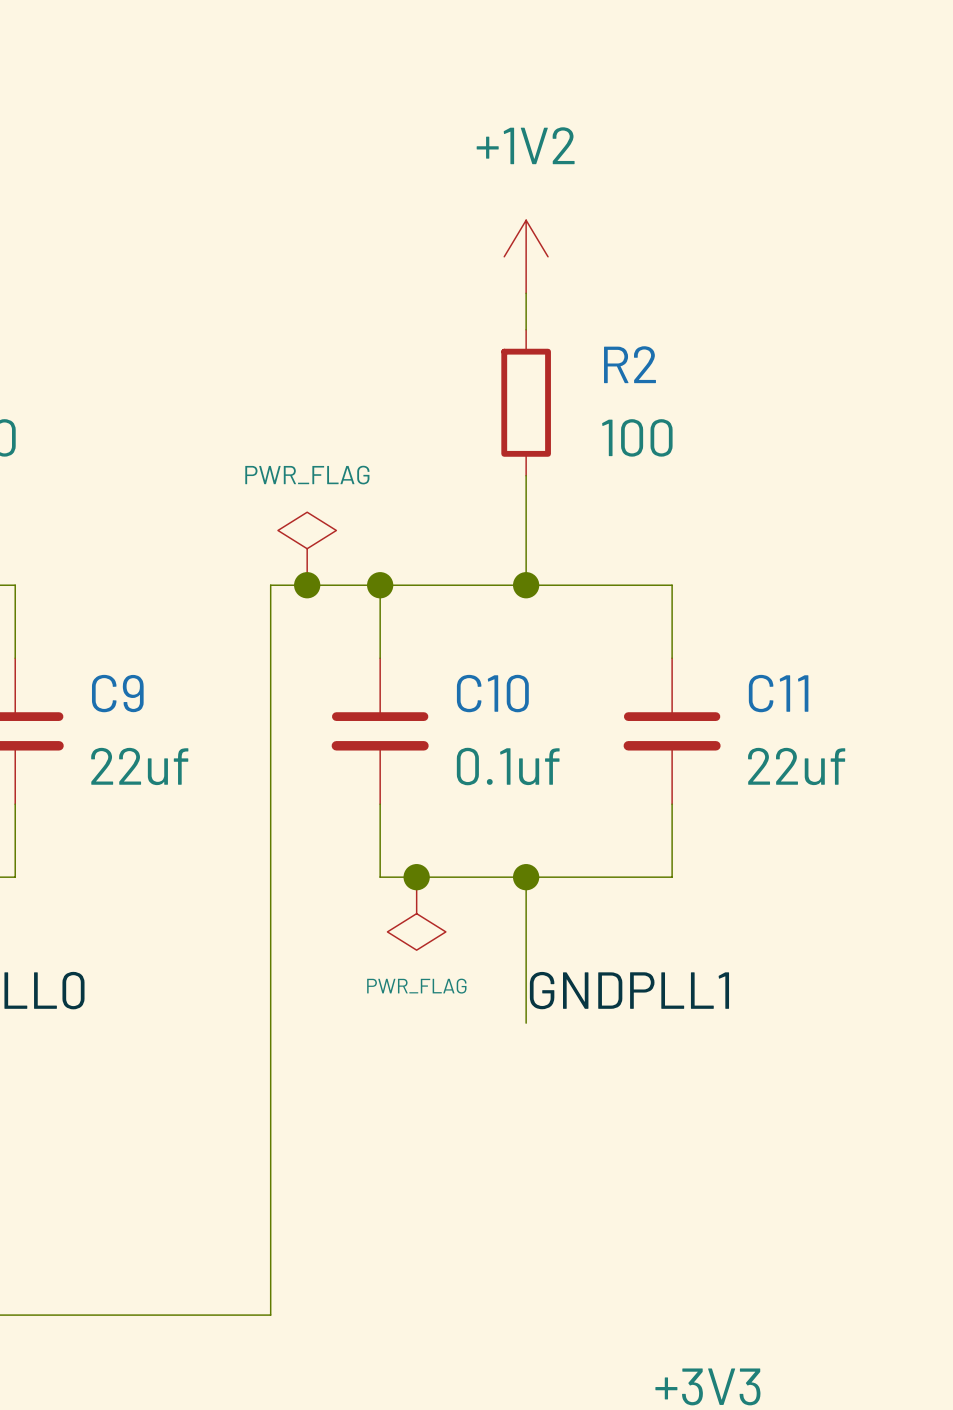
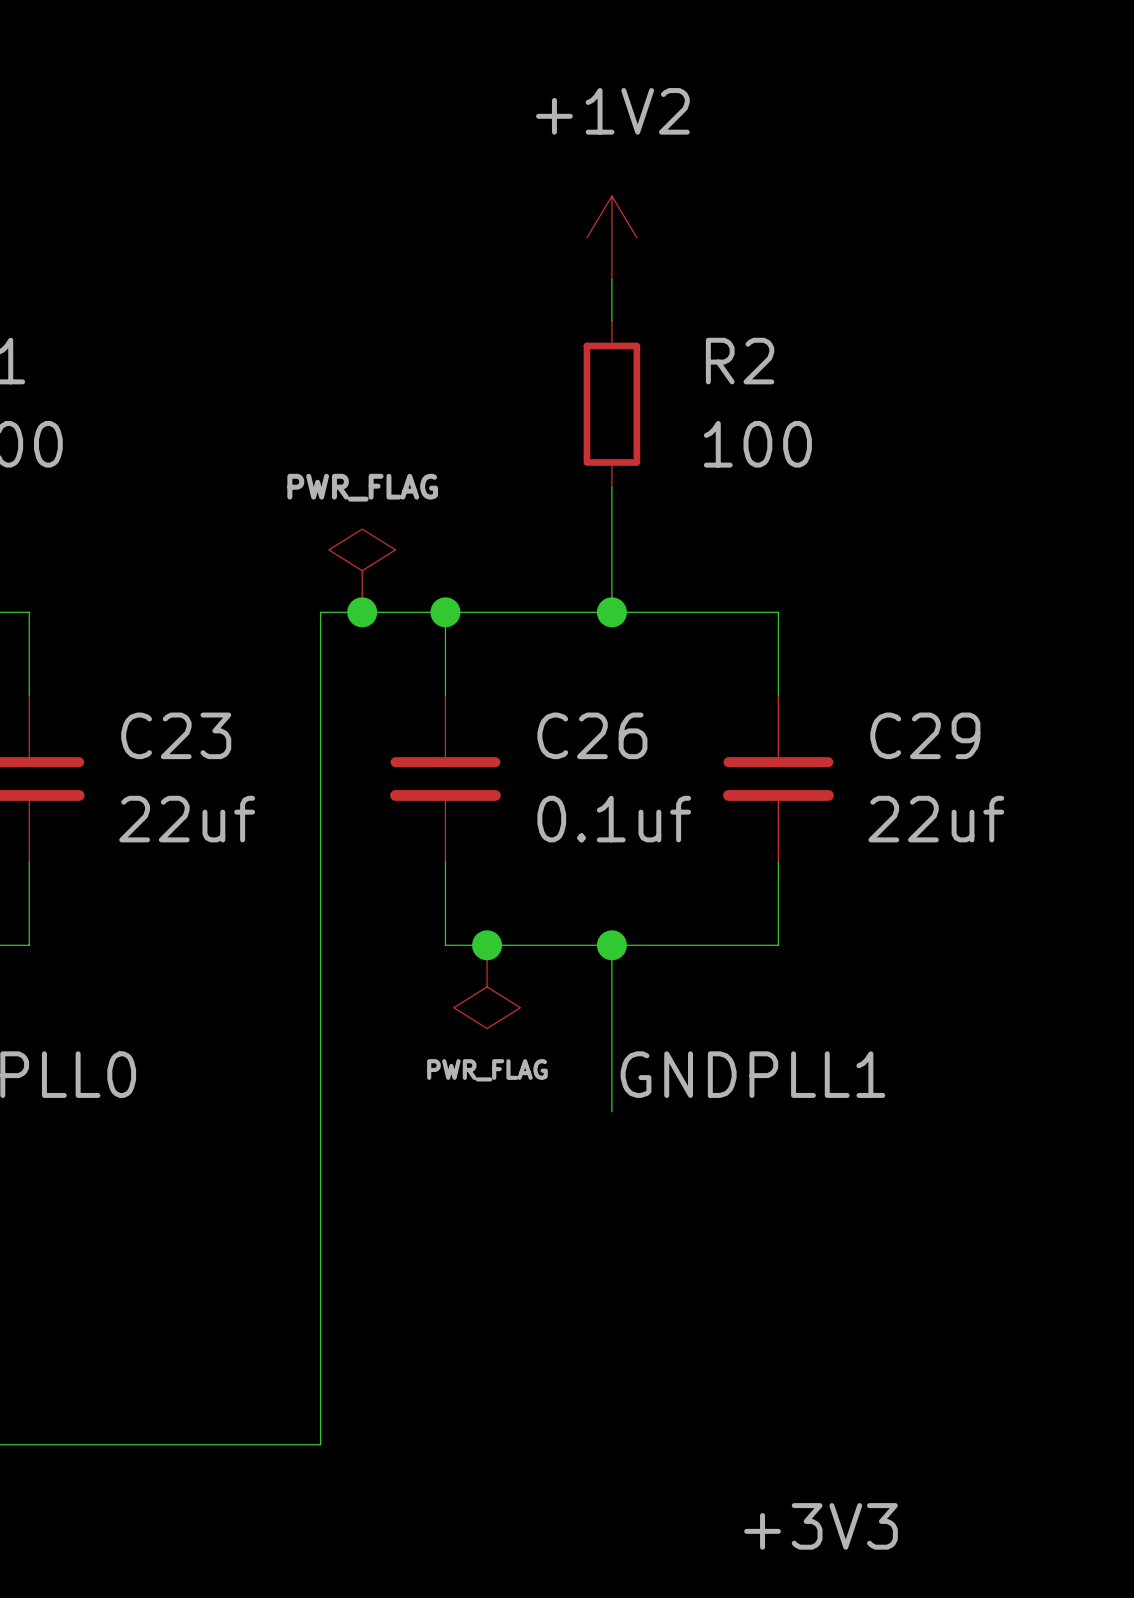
C9 name: C9 (117, 693) -> C23 (176, 735)
C10 name: C10 (492, 693) -> C26 (592, 735)
C11 name: C11 (778, 693) -> C29 (925, 735)

